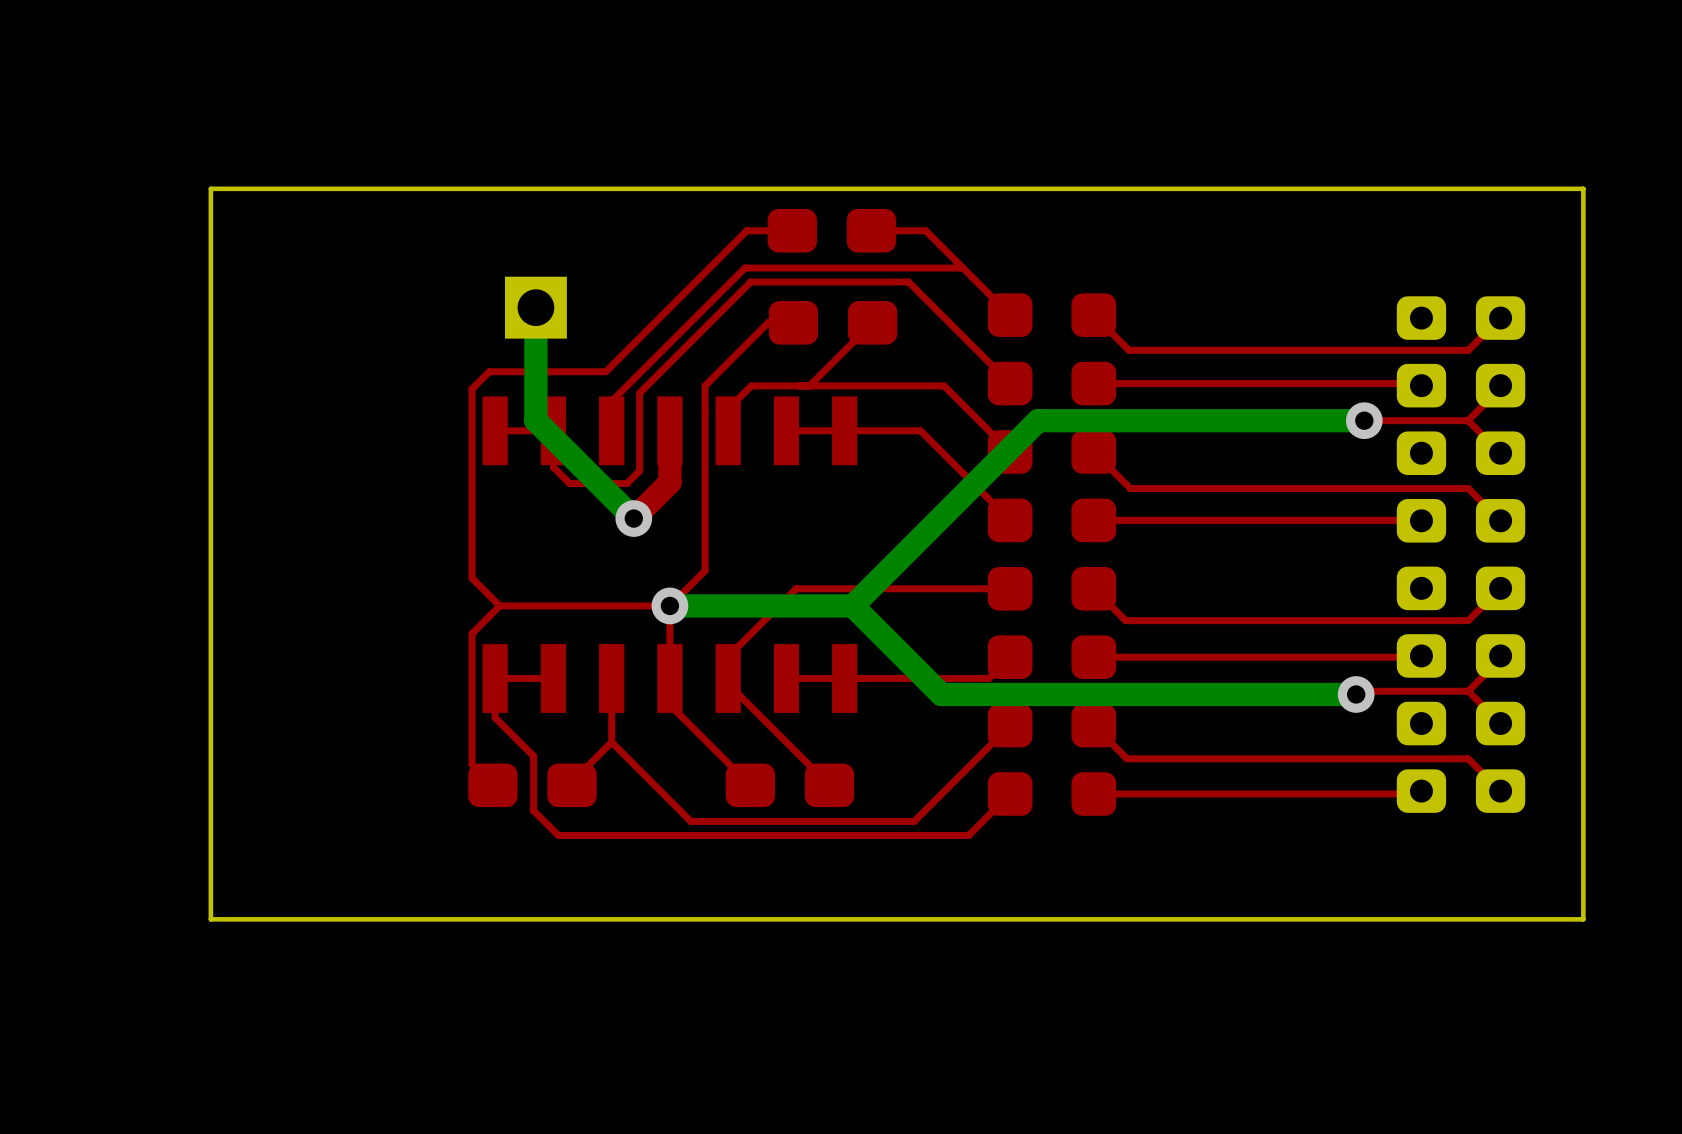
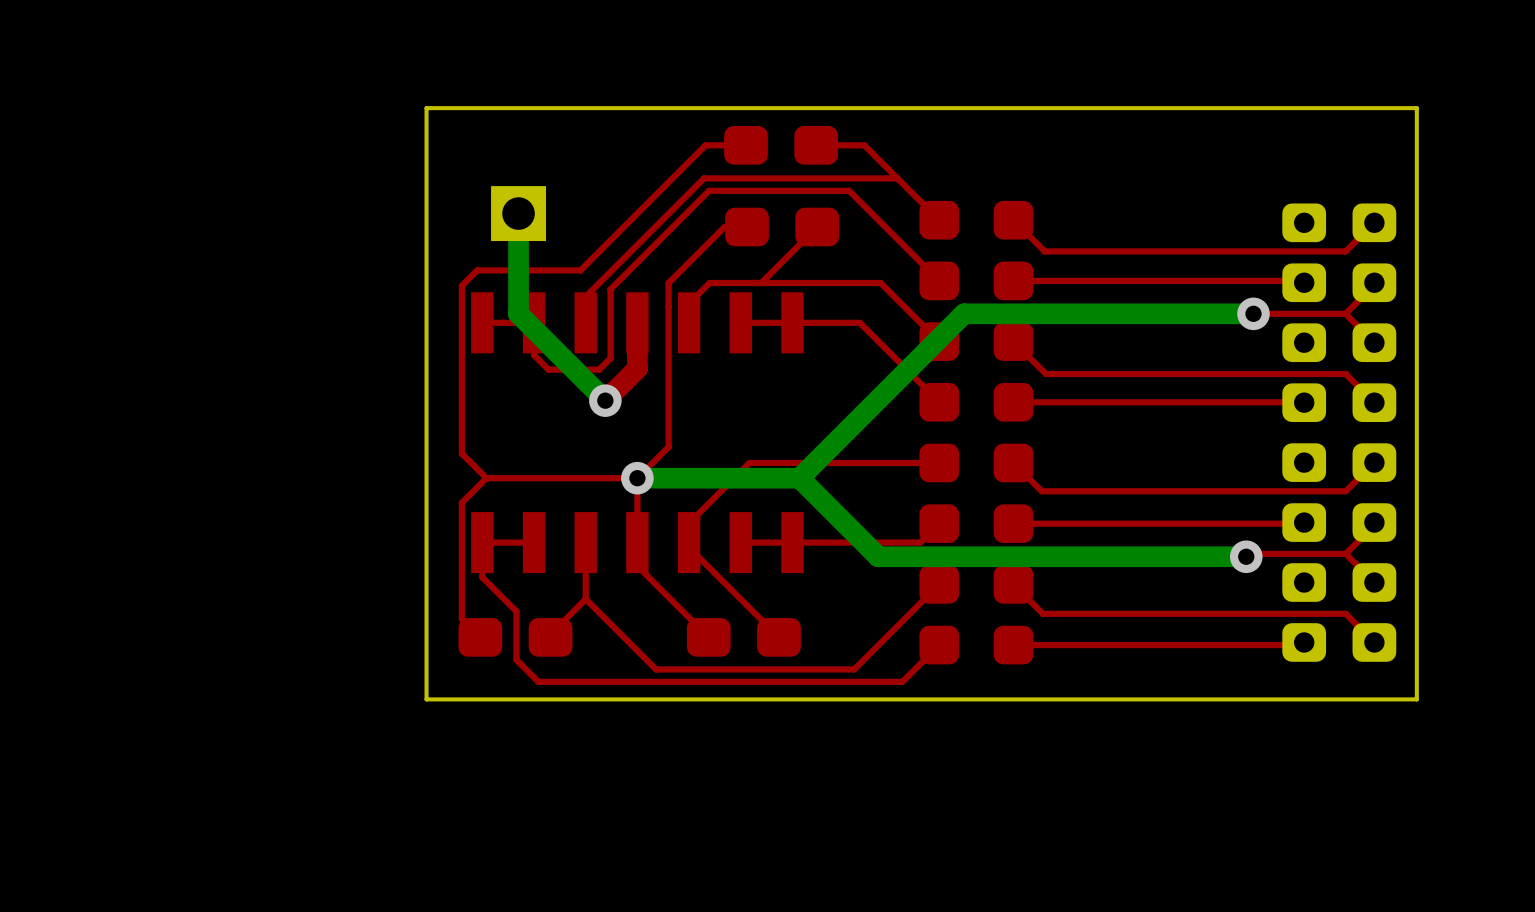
board edge: (1548, 188) (1583, 188) (1583, 919) (210, 919) (210, 188) (432, 188) -> (1416, 108) (1416, 699) (426, 699) (426, 108)

